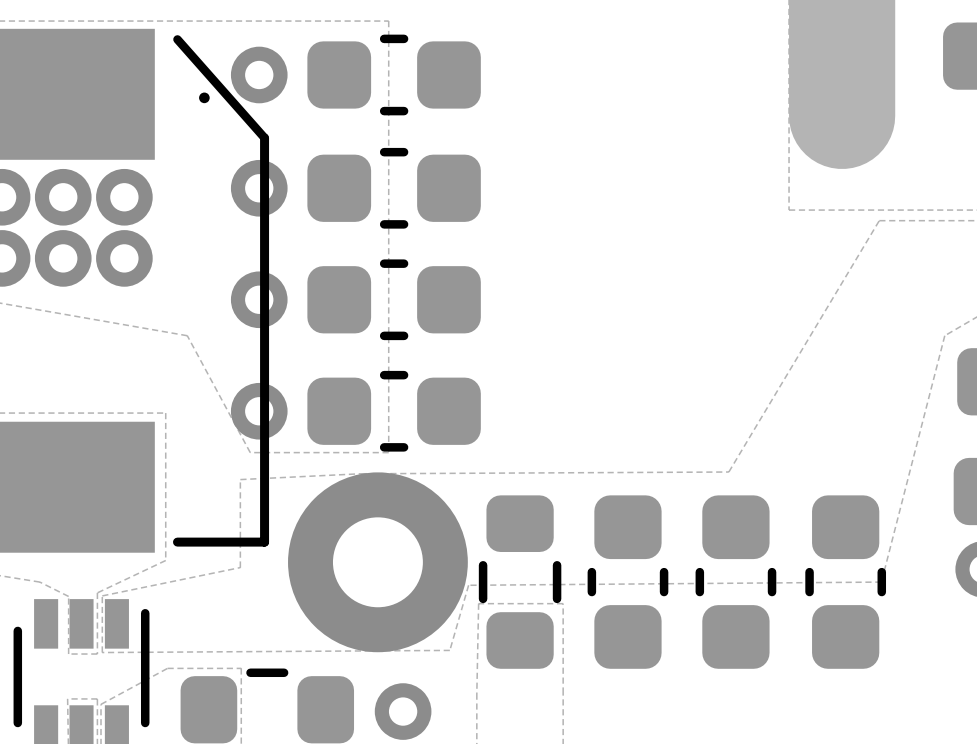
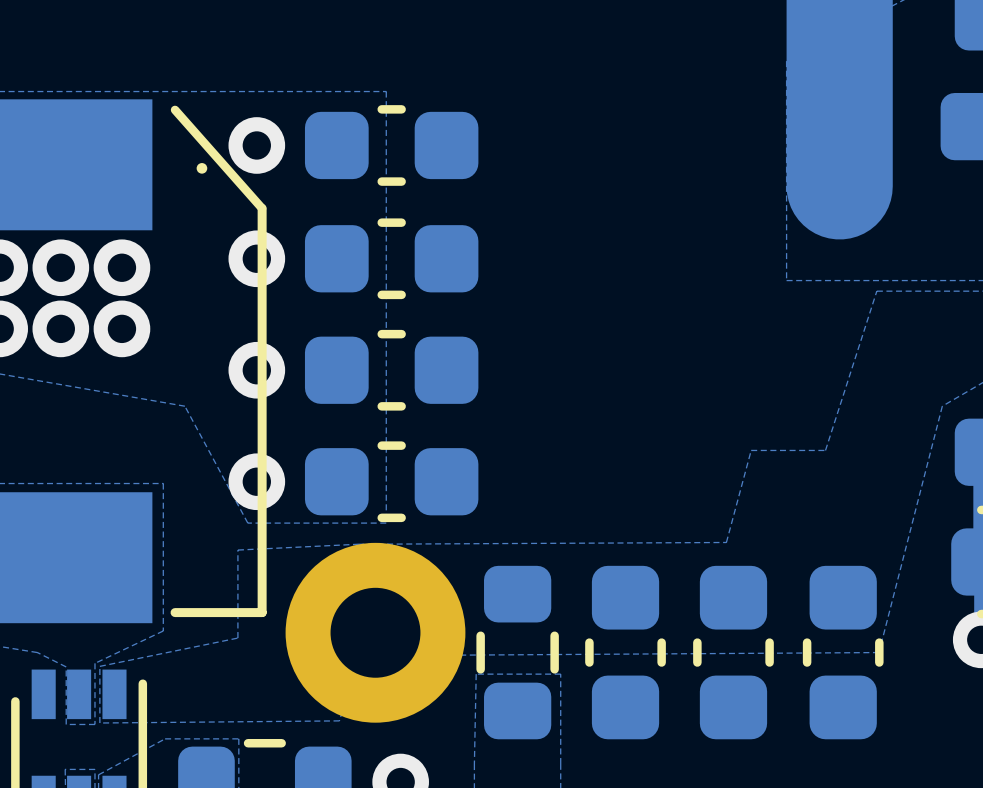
zone outline: (879, 220) (728, 472) -> (876, 291) (825, 450) (751, 450) (726, 542)
zone outline: (881, 582) (468, 585) (449, 650) (102, 652) -> (878, 652) (358, 655) (339, 720) (99, 723)

